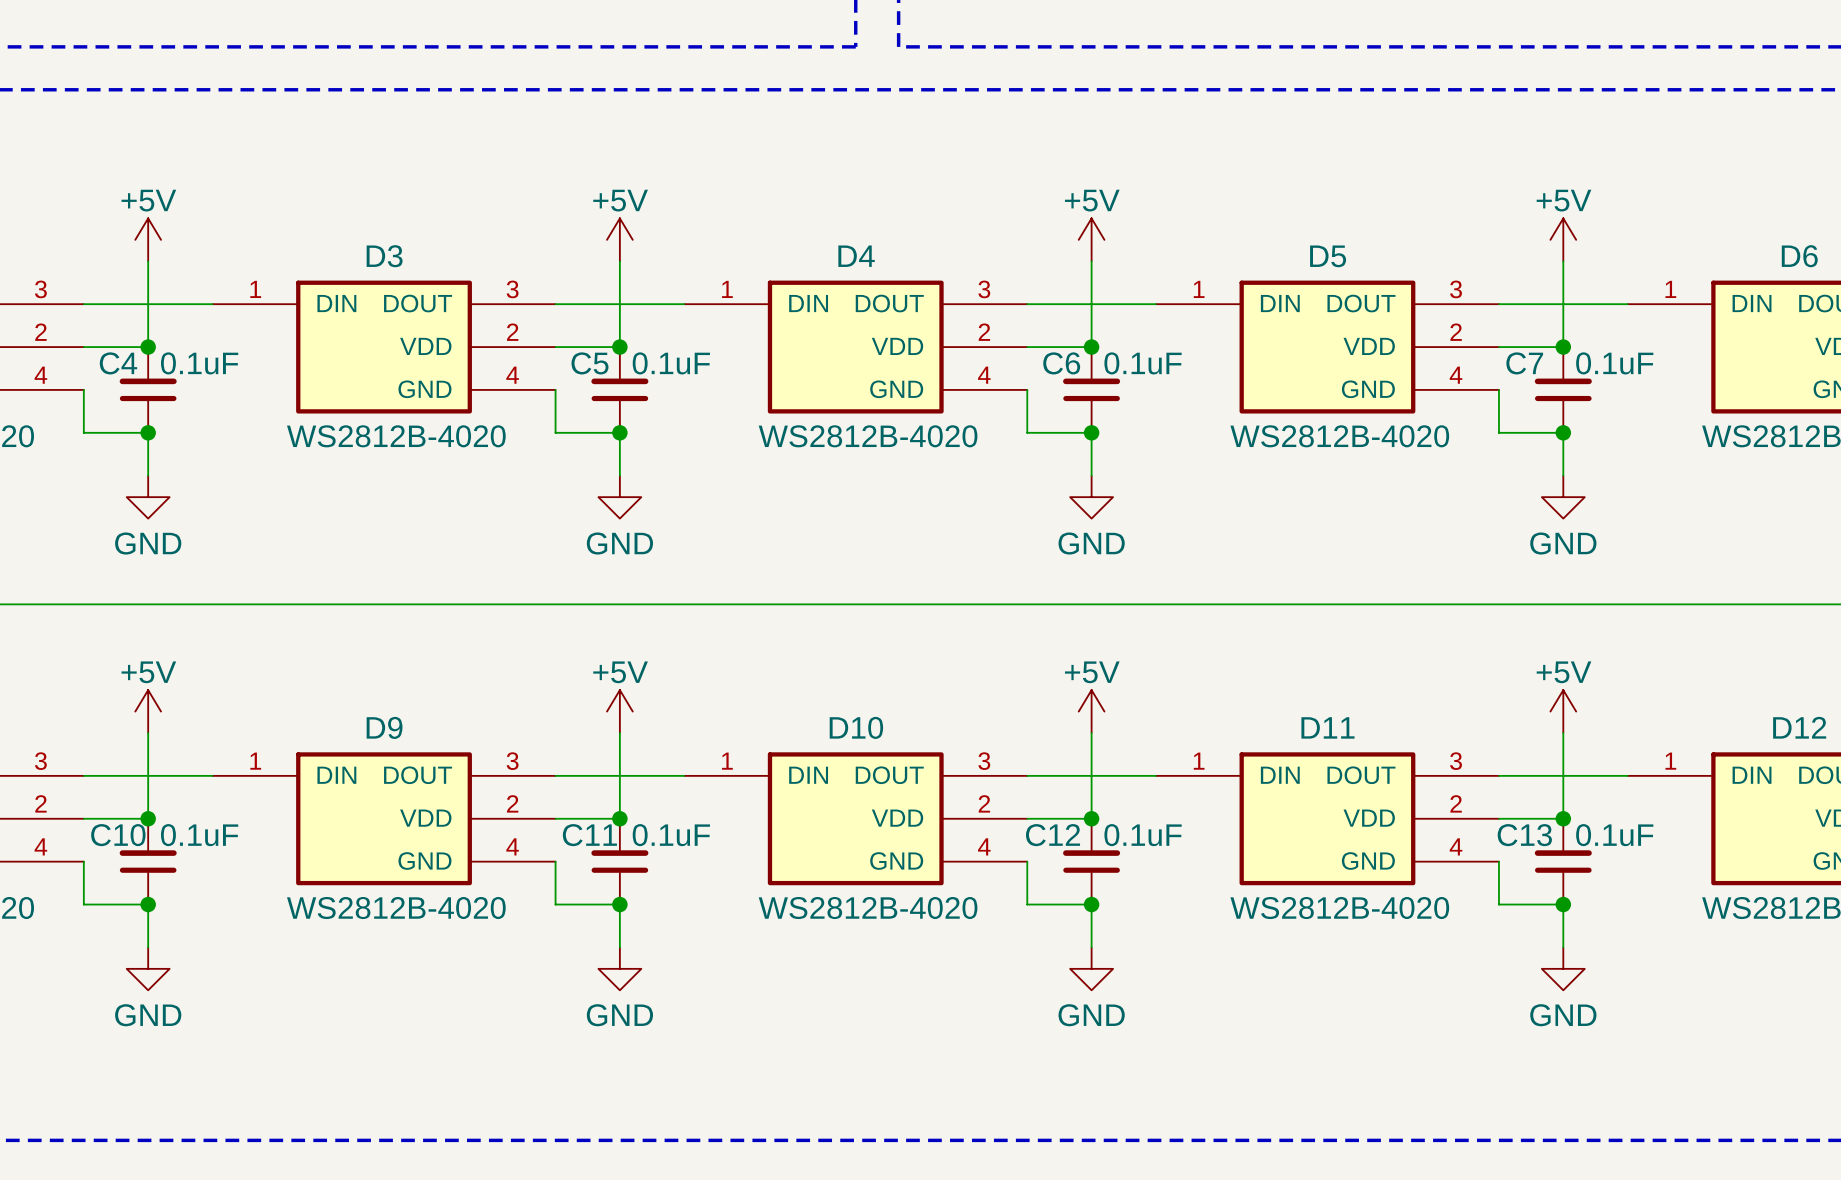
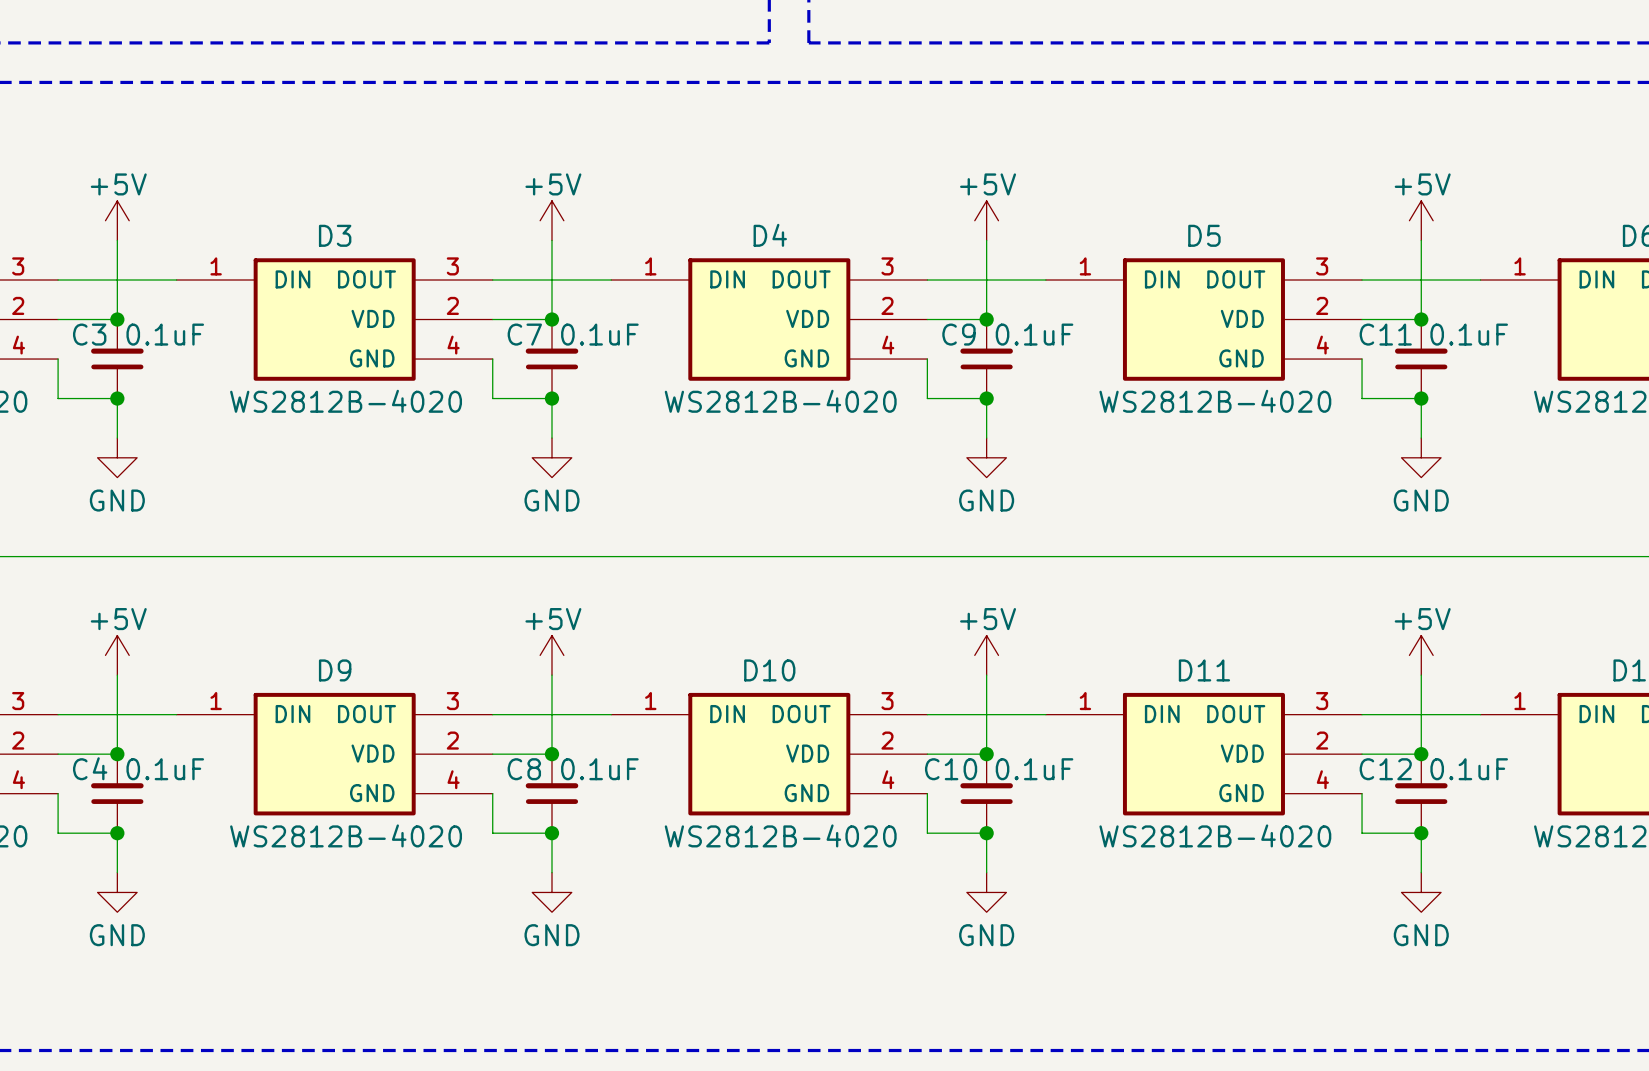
C4 name: C4 (118, 363) -> C3 (89, 334)
C5 name: C5 (590, 363) -> C7 (524, 334)
C6 name: C6 (1061, 363) -> C9 (958, 334)
C7 name: C7 (1524, 363) -> C11 (1385, 334)
C10 name: C10 (118, 835) -> C4 (90, 768)
C11 name: C11 (589, 835) -> C8 (524, 769)
C12 name: C12 (1053, 835) -> C10 (951, 769)
C13 name: C13 (1524, 835) -> C12 (1385, 769)

